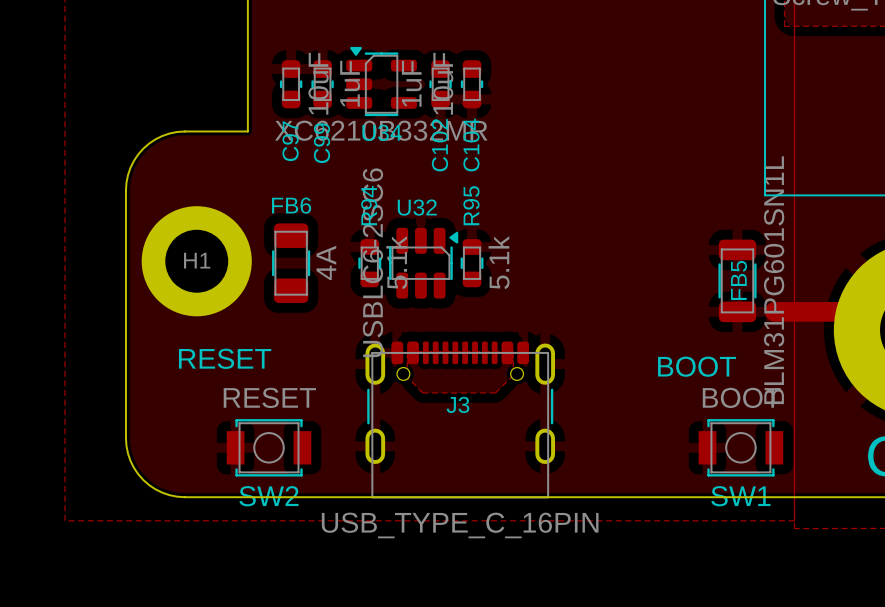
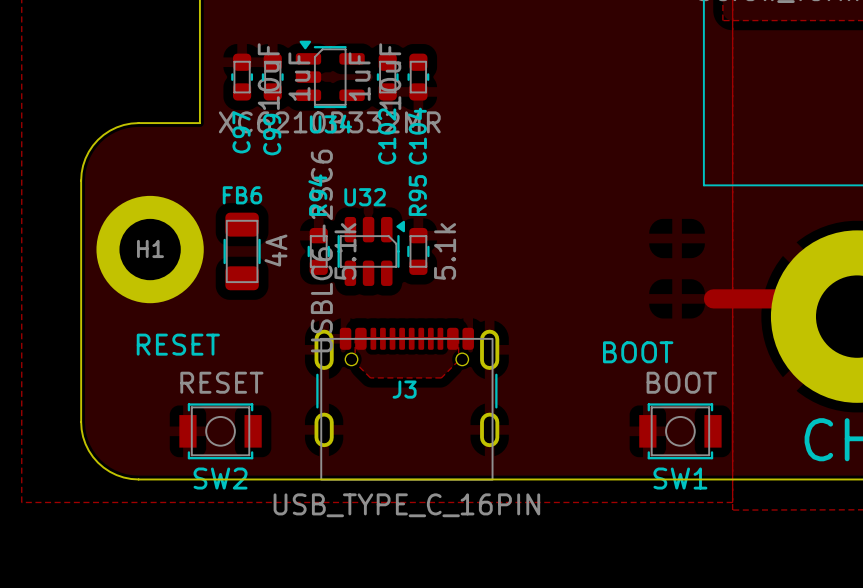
FB5: BLM31PG601SN1L (737, 280) -> none

